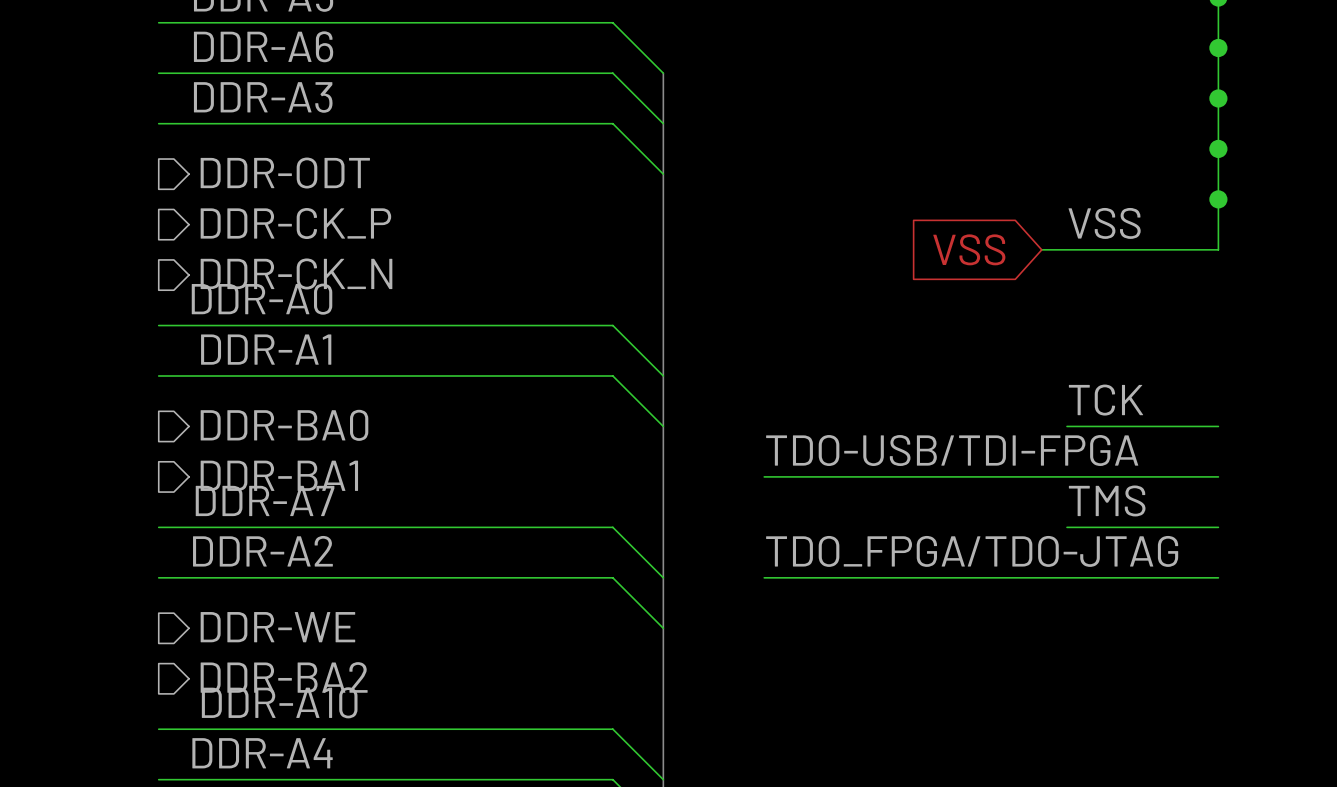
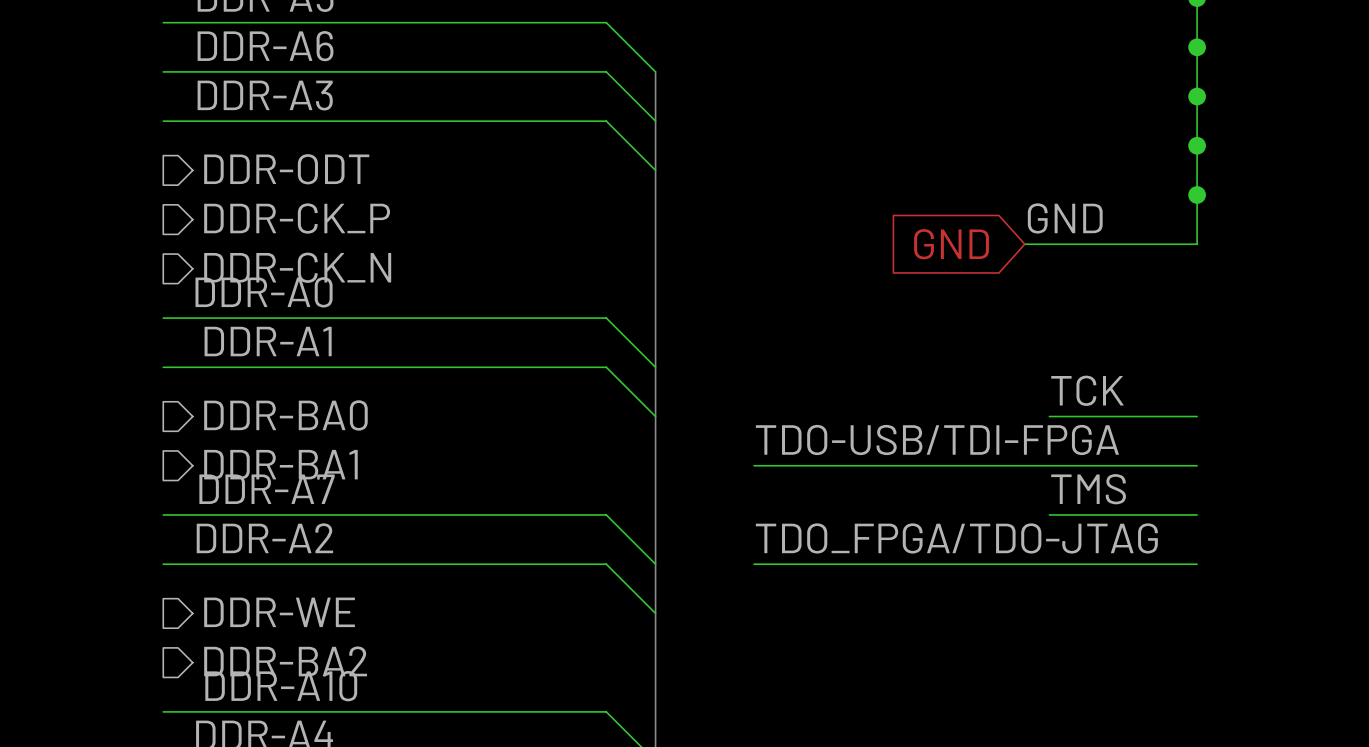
label: none -> GND (1065, 218)
label: VSS (1104, 223) -> none
global label: VSS (969, 249) -> GND (951, 244)

